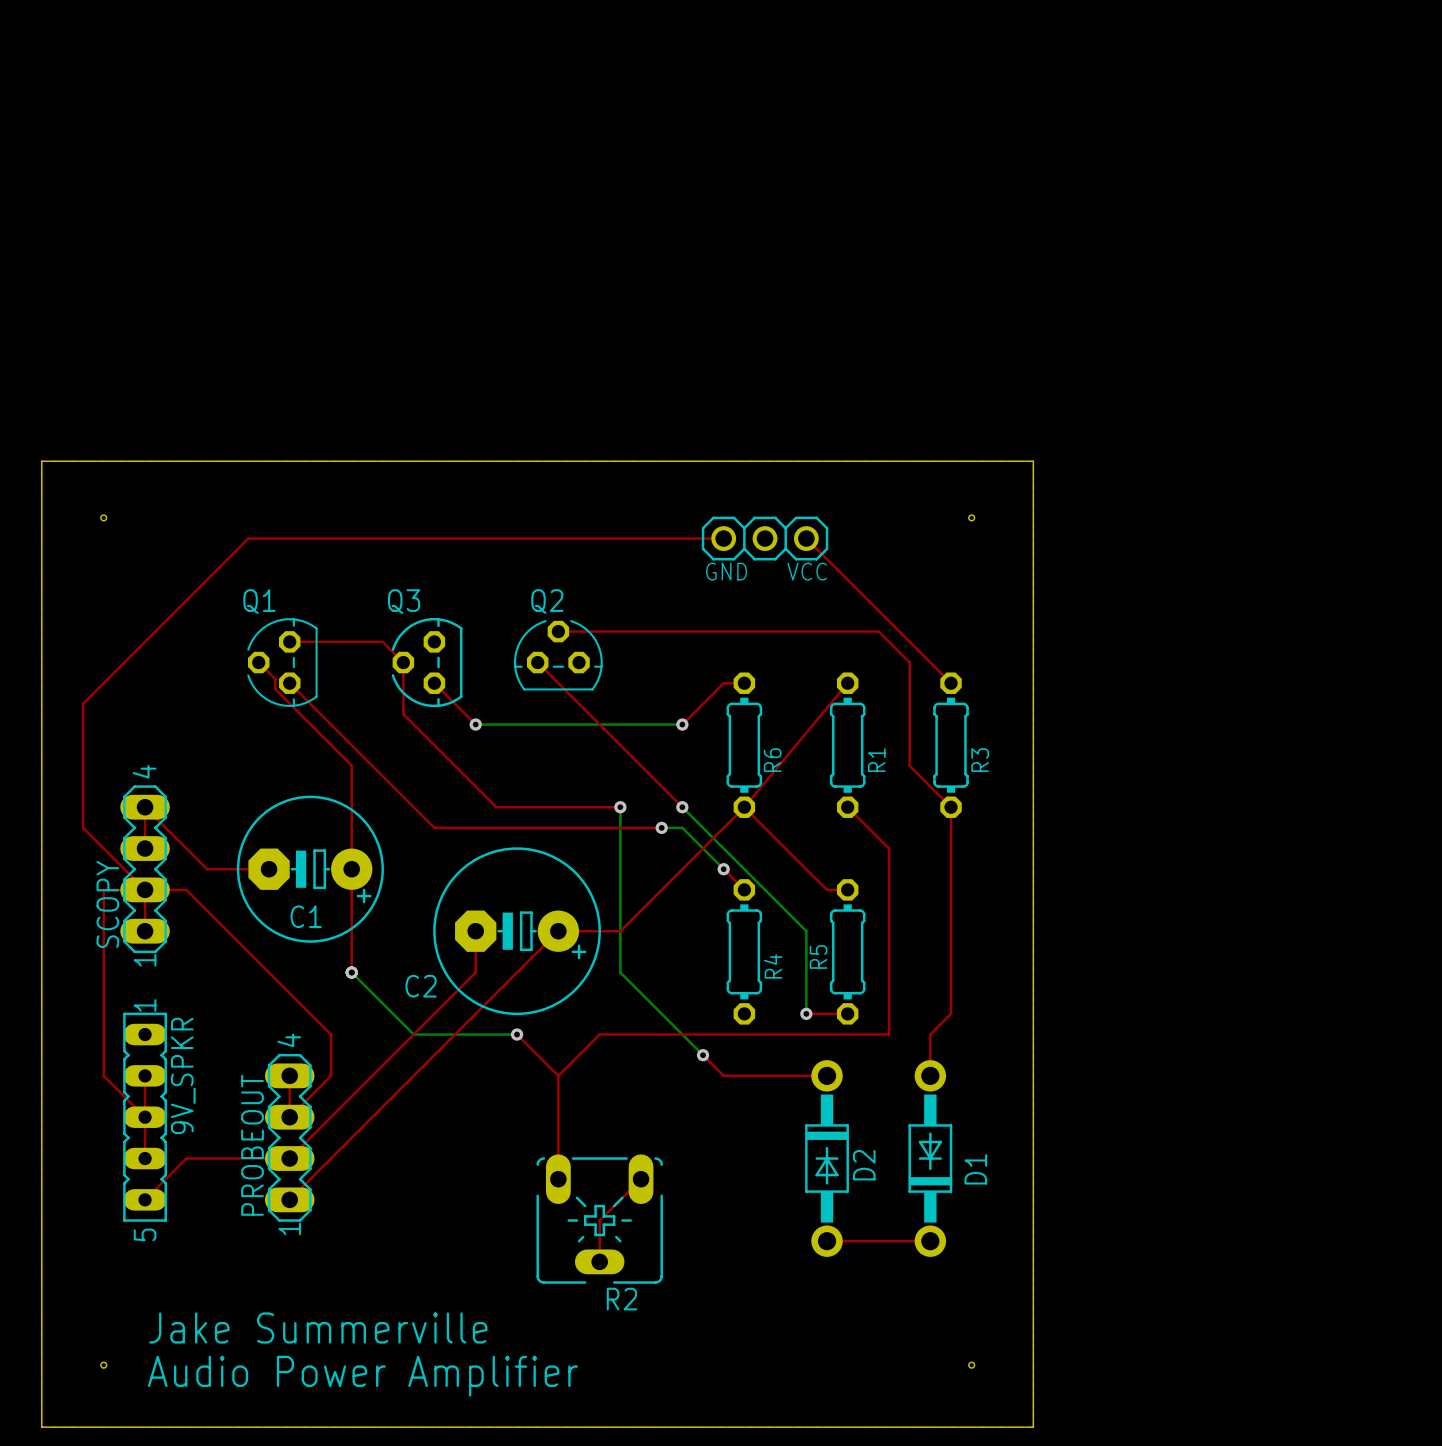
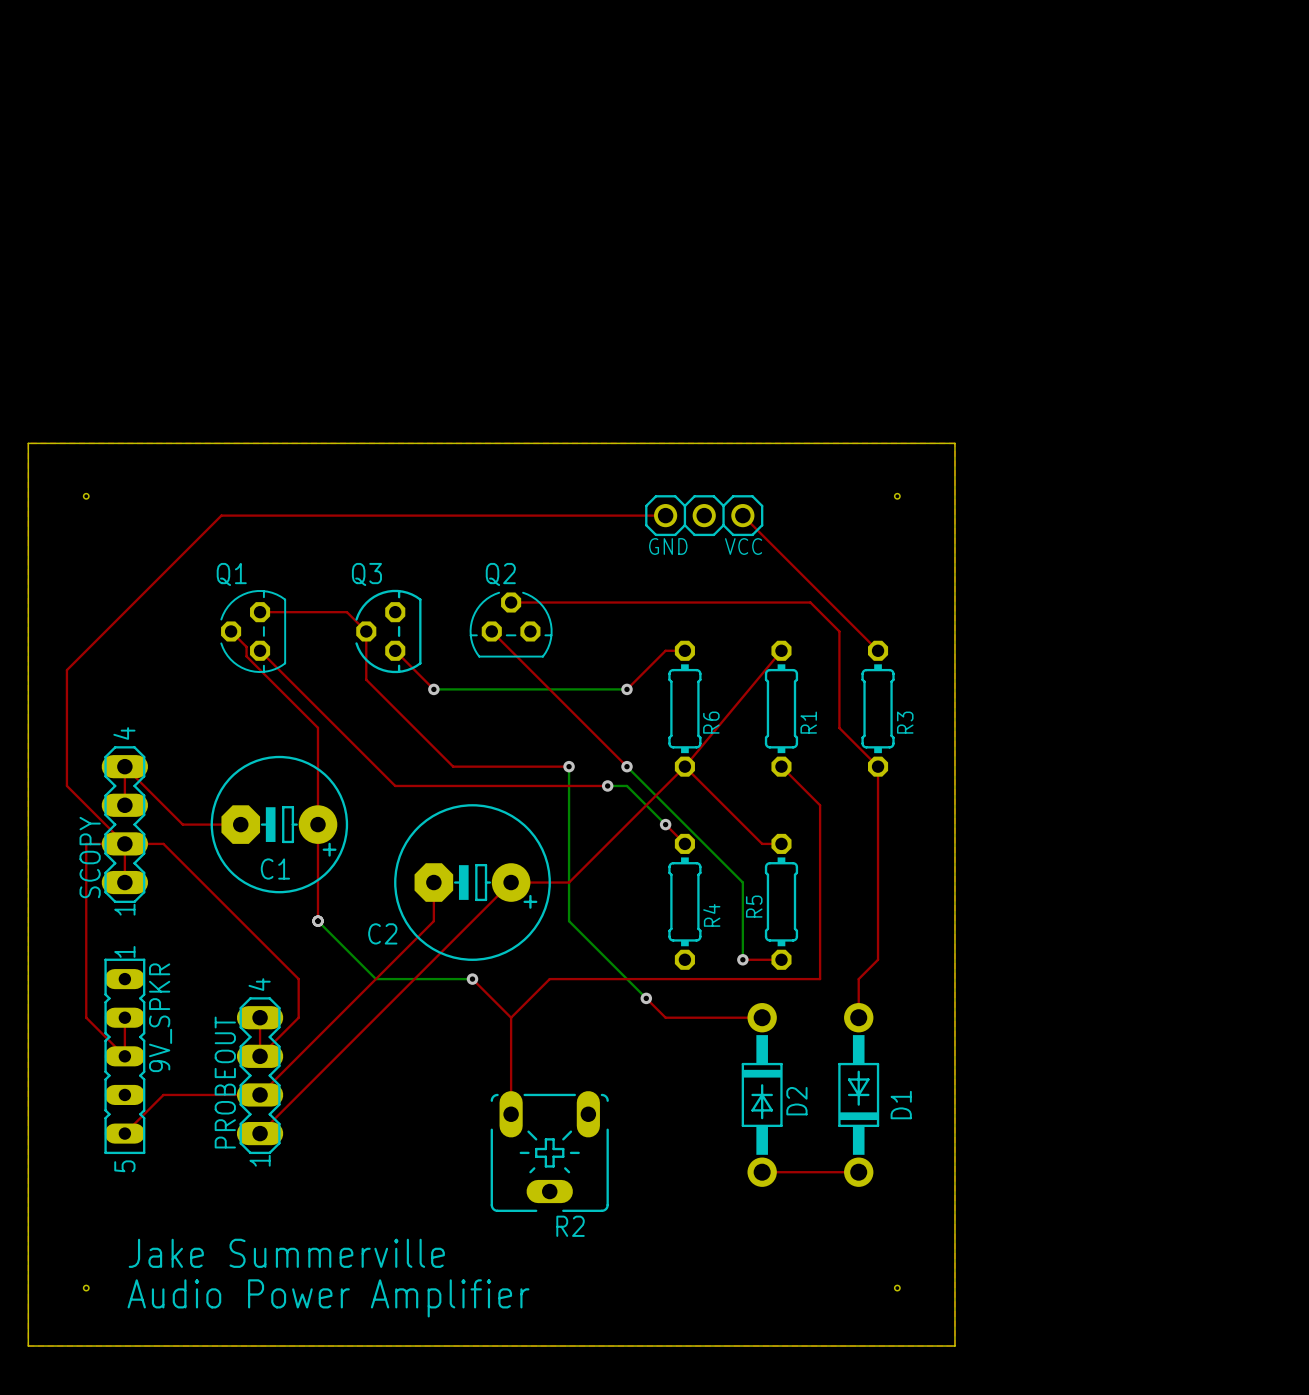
top track: (145, 1117) (145, 1158) -> none
top track: (641, 1179) (599, 1220) (599, 1261) -> none

